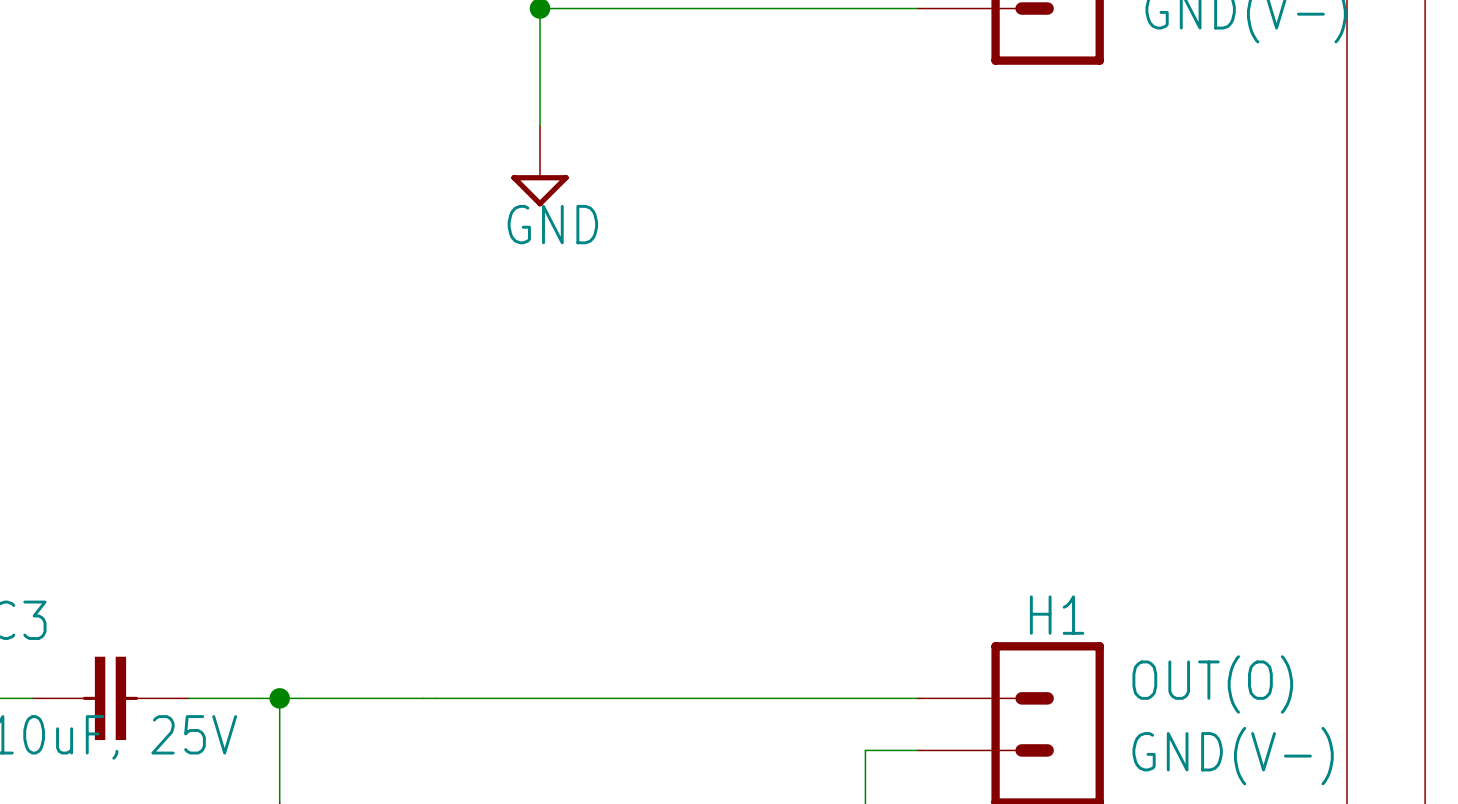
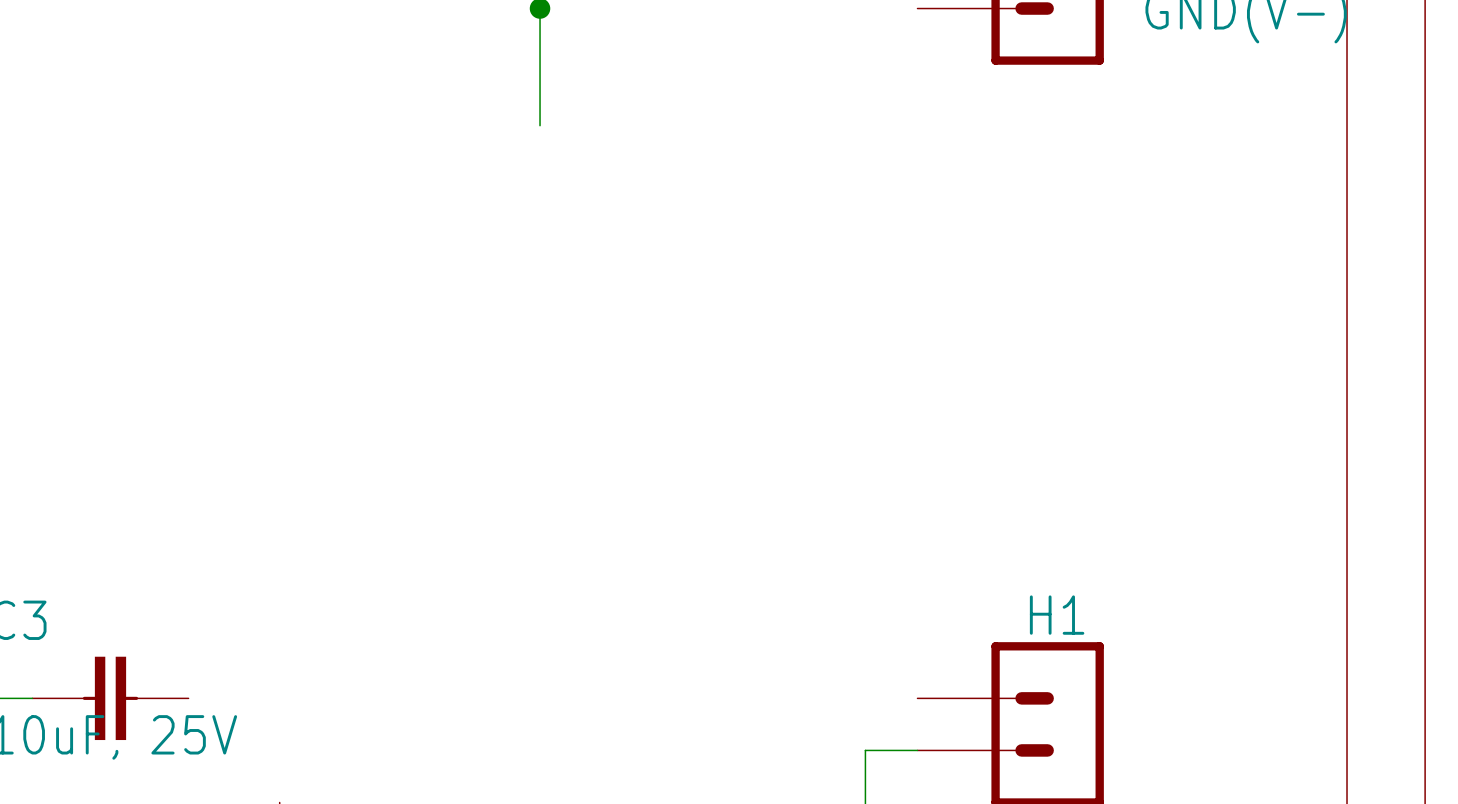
wire: (540, 8) (917, 8) -> none
power symbol: GND (540, 166) -> none
text: OUT(O) (1212, 684) -> none
wire: (188, 698) (917, 698) -> none
wire: (279, 698) (279, 802) -> none
junction: (279, 698) -> none
text: GND(V-) (1233, 756) -> none

